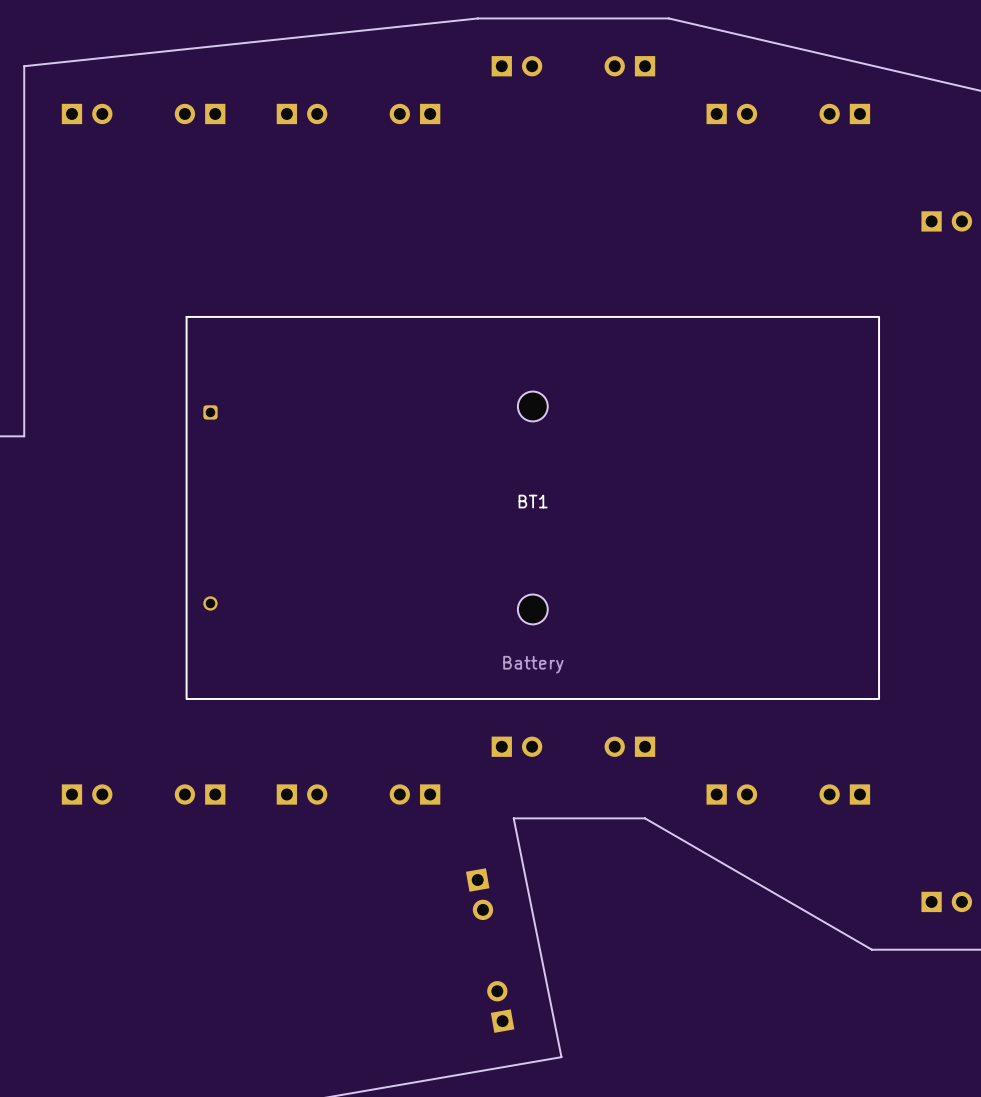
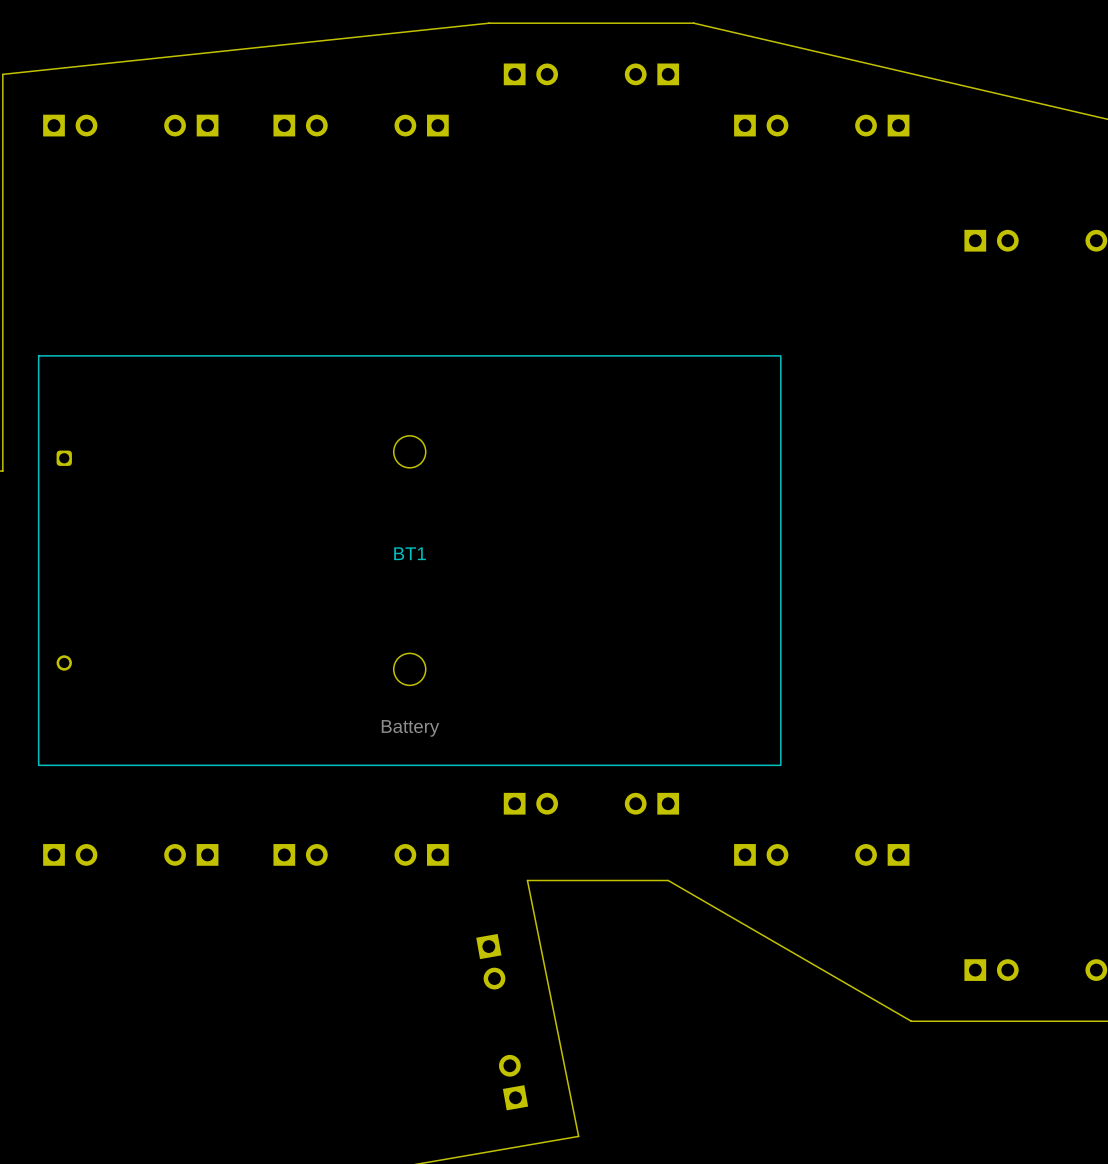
BT1 position: (532, 507) -> (409, 560)

